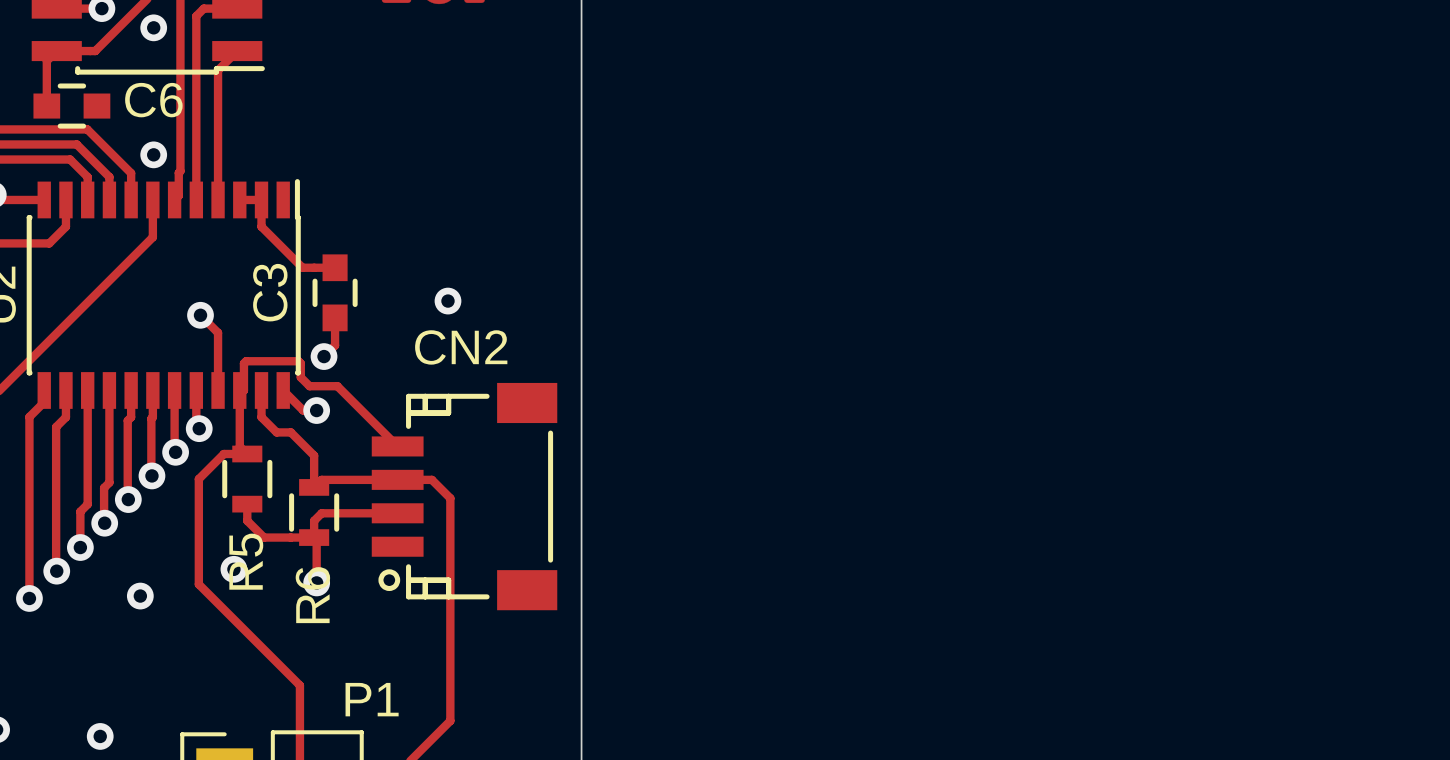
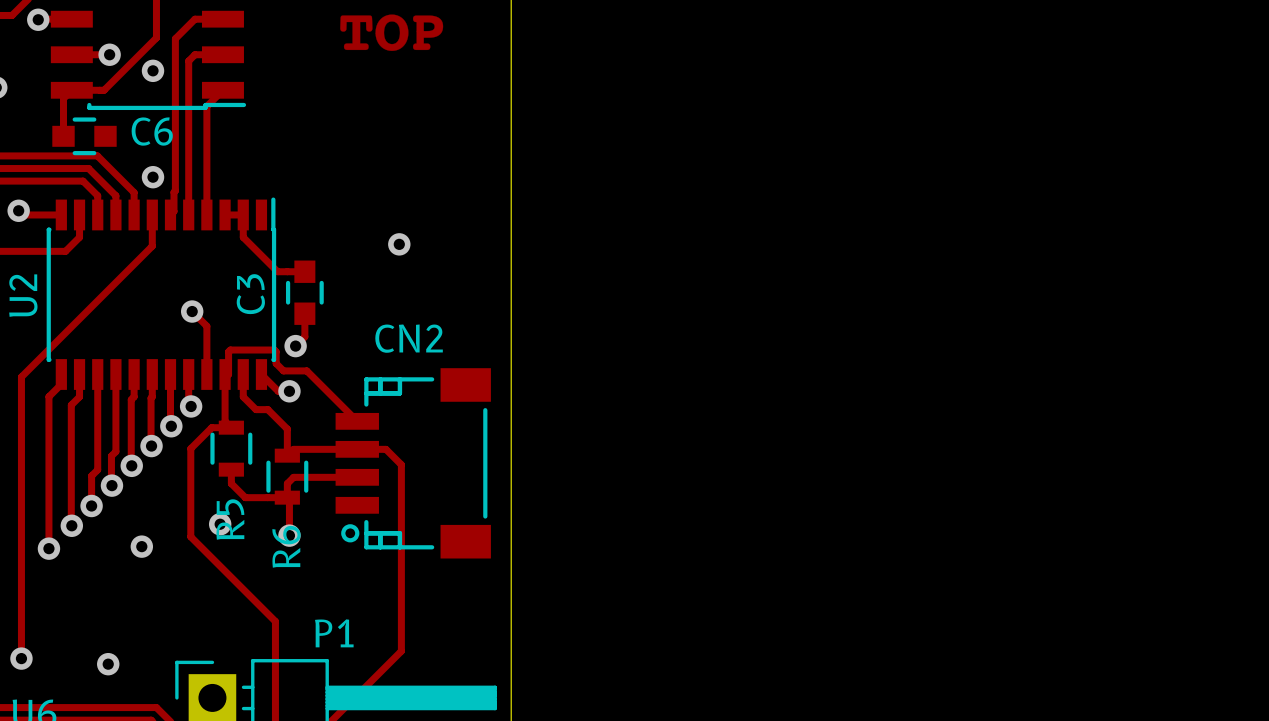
via position: (447, 301) -> (399, 244)

